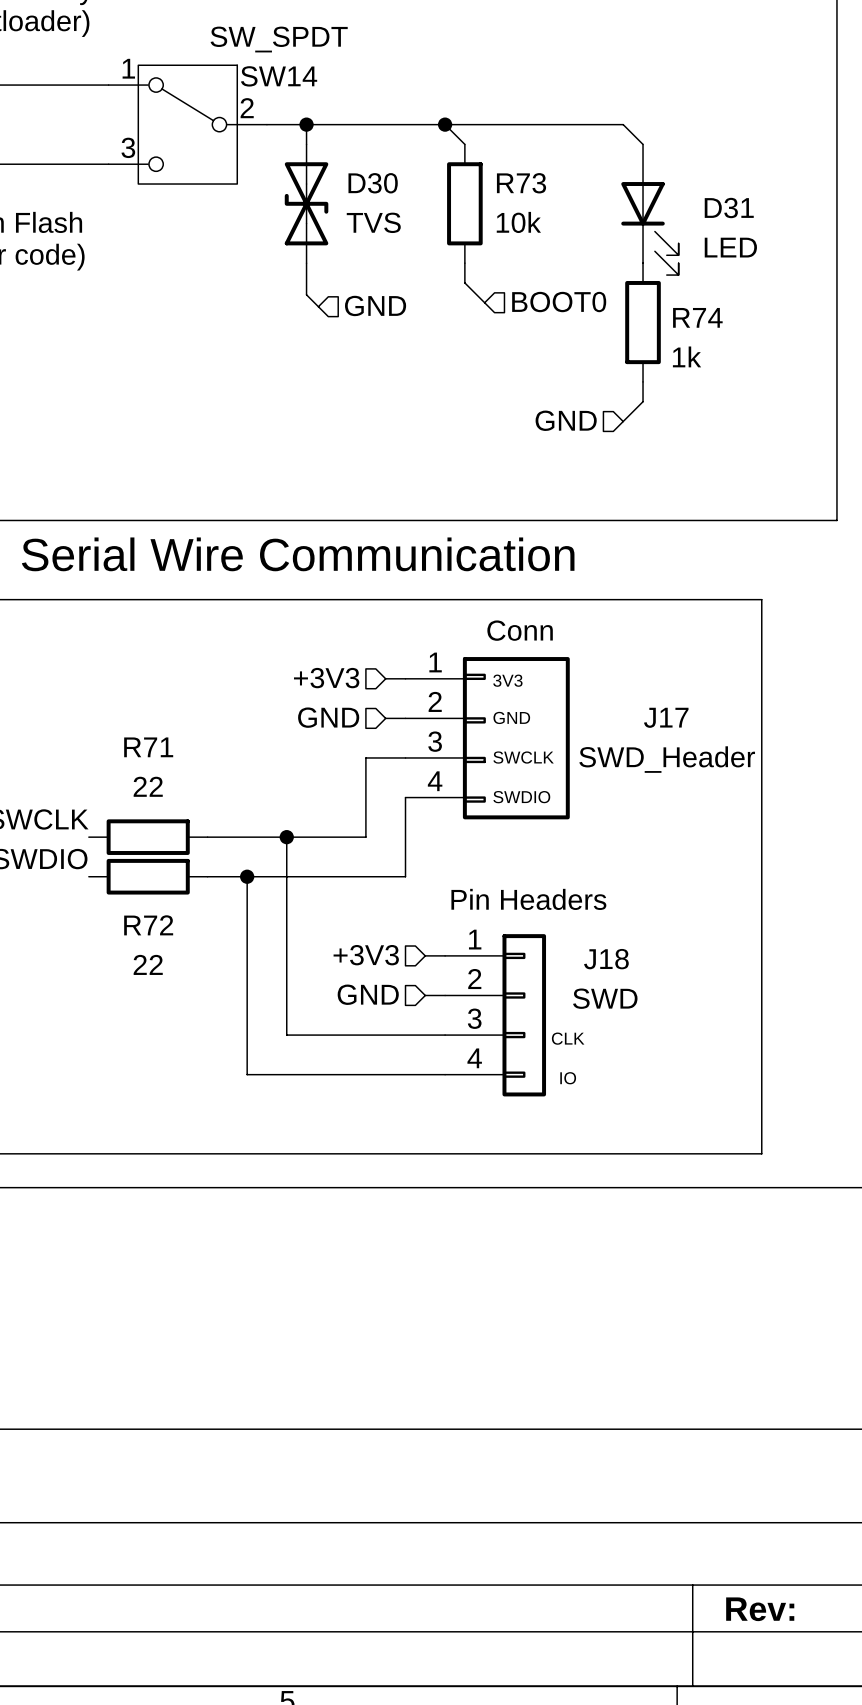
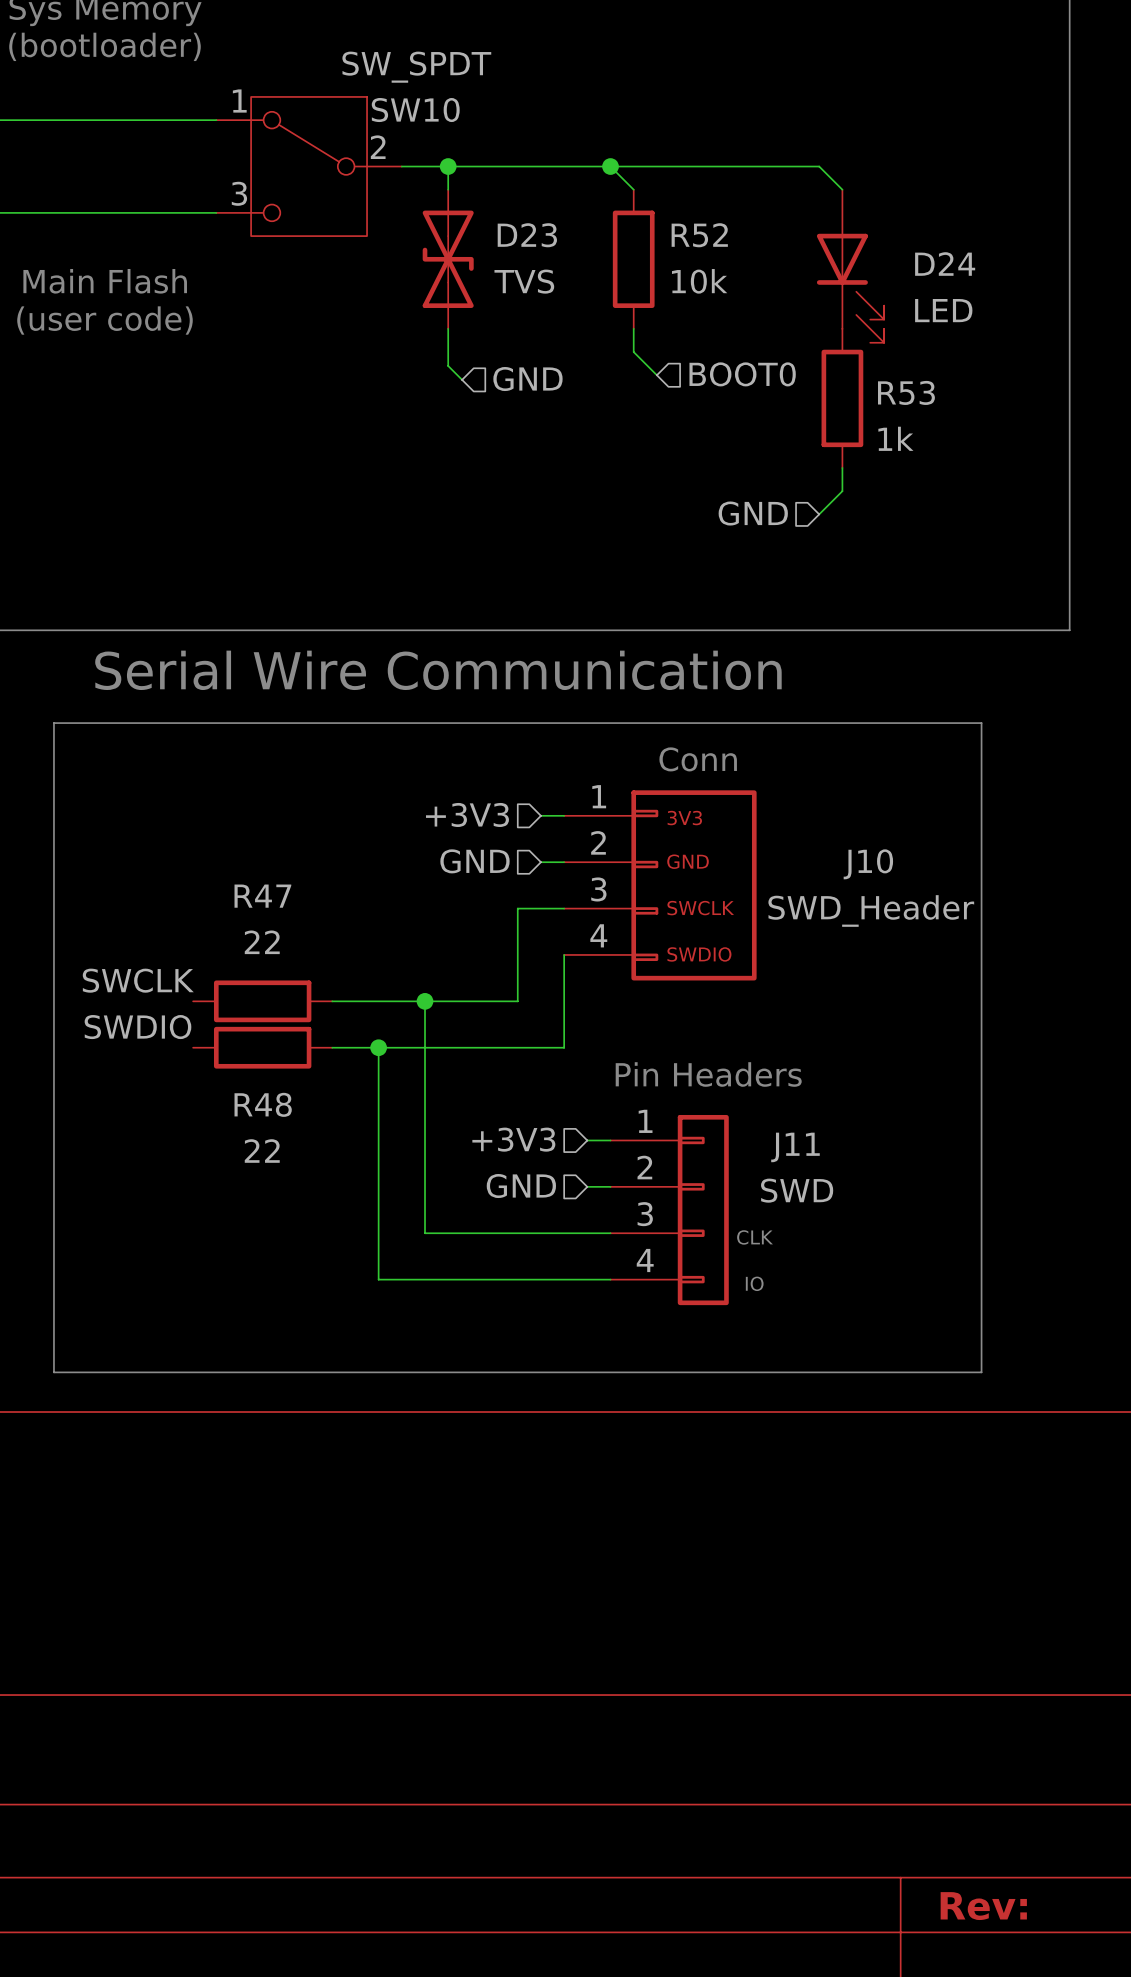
SW14 name: SW14 (279, 76) -> SW10 (415, 110)
D30 name: D30 (373, 183) -> D23 (527, 235)
R73 name: R73 (521, 183) -> R52 (699, 235)
D31 name: D31 (729, 208) -> D24 (945, 264)
R74 name: R74 (697, 317) -> R53 (906, 392)
J17 name: J17 (666, 717) -> J10 (868, 864)
R71 name: R71 (148, 747) -> R47 (262, 896)
R72 name: R72 (148, 925) -> R48 (263, 1104)
J18 name: J18 (606, 959) -> J11 (795, 1147)

